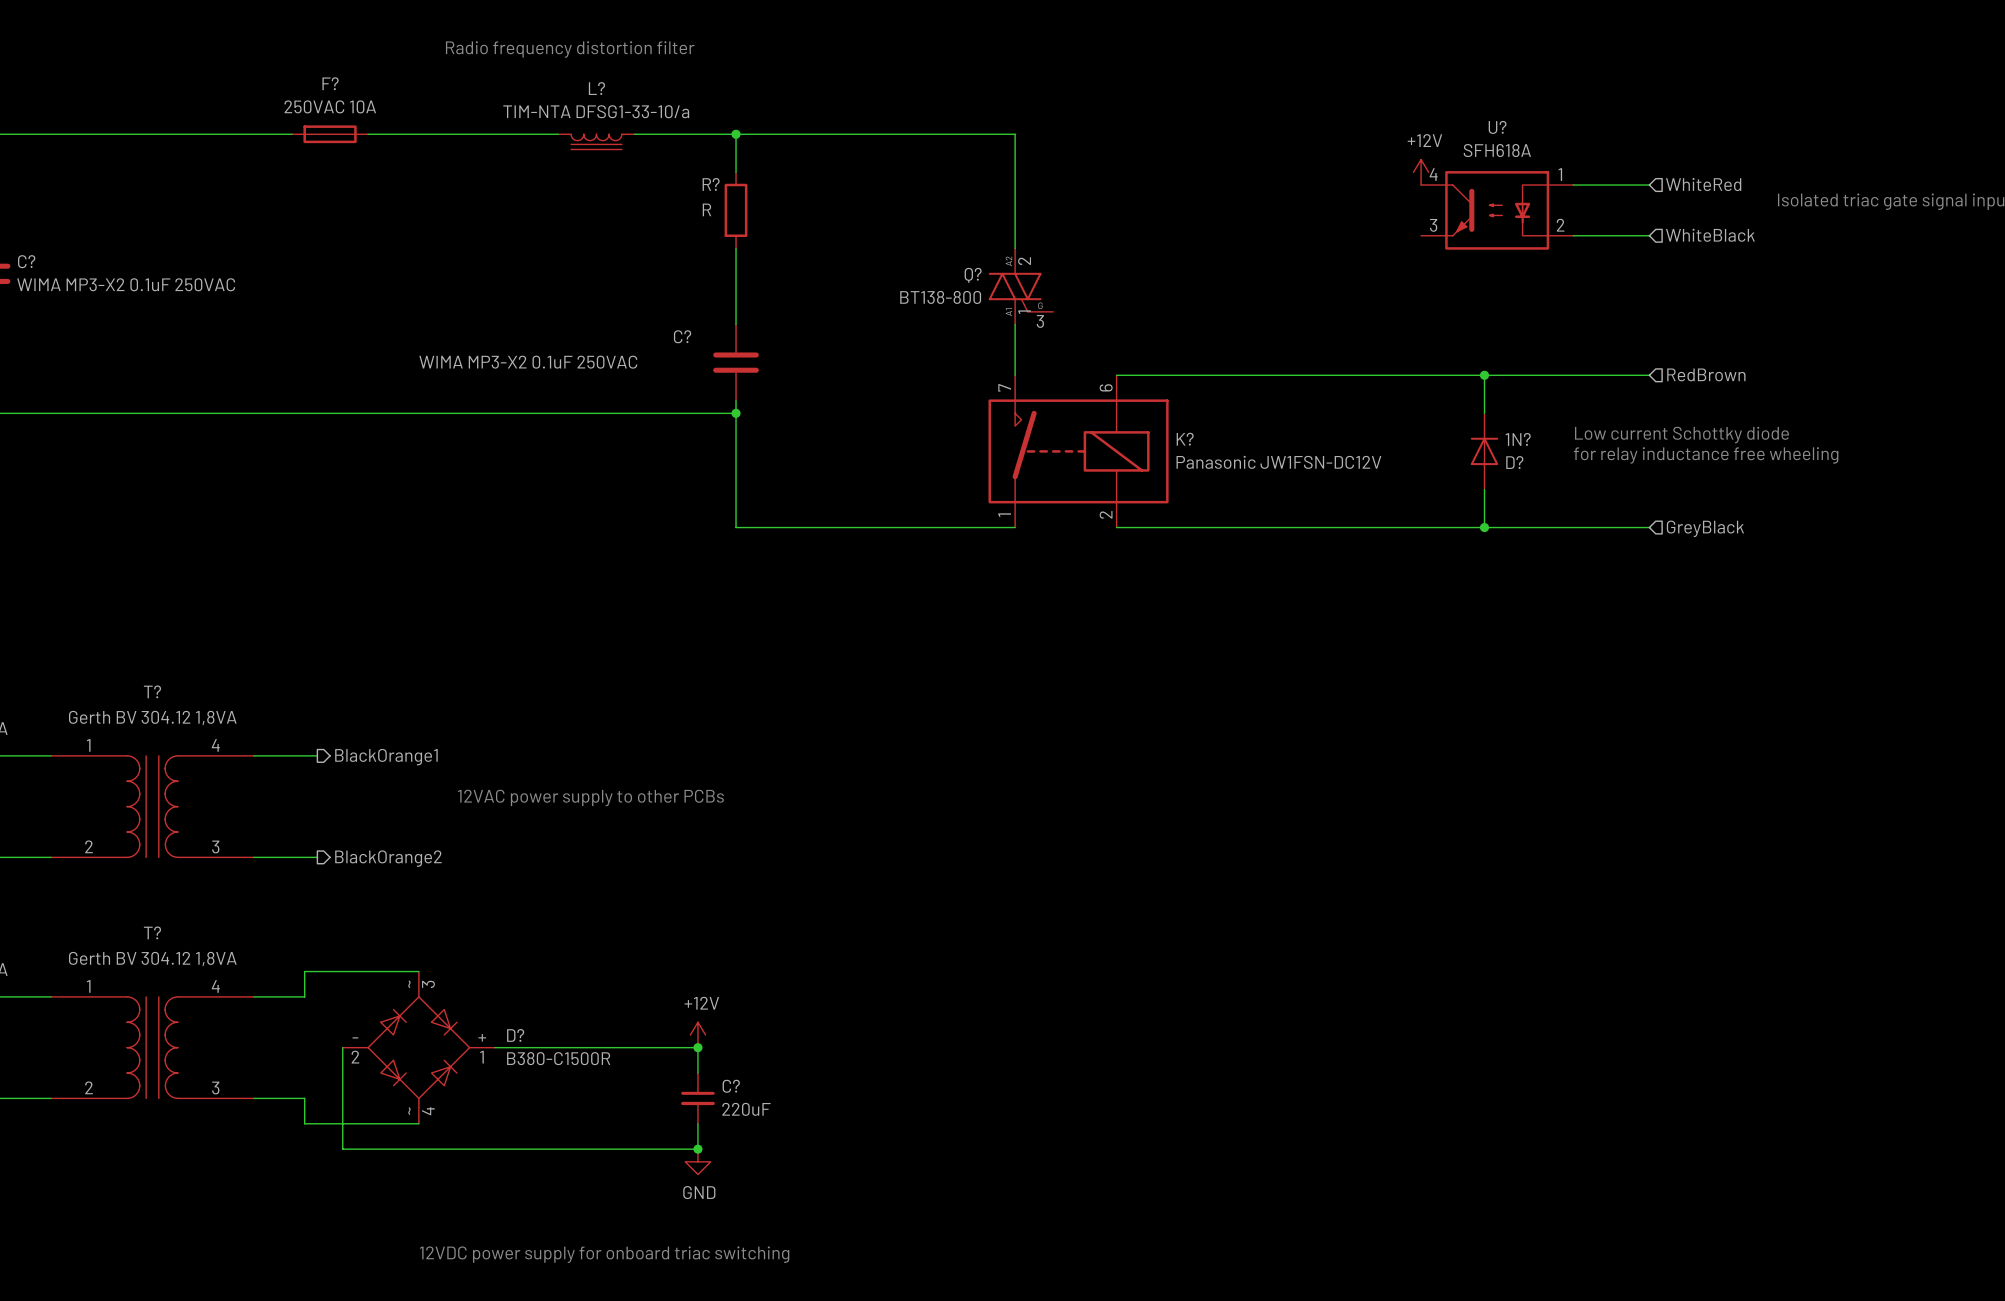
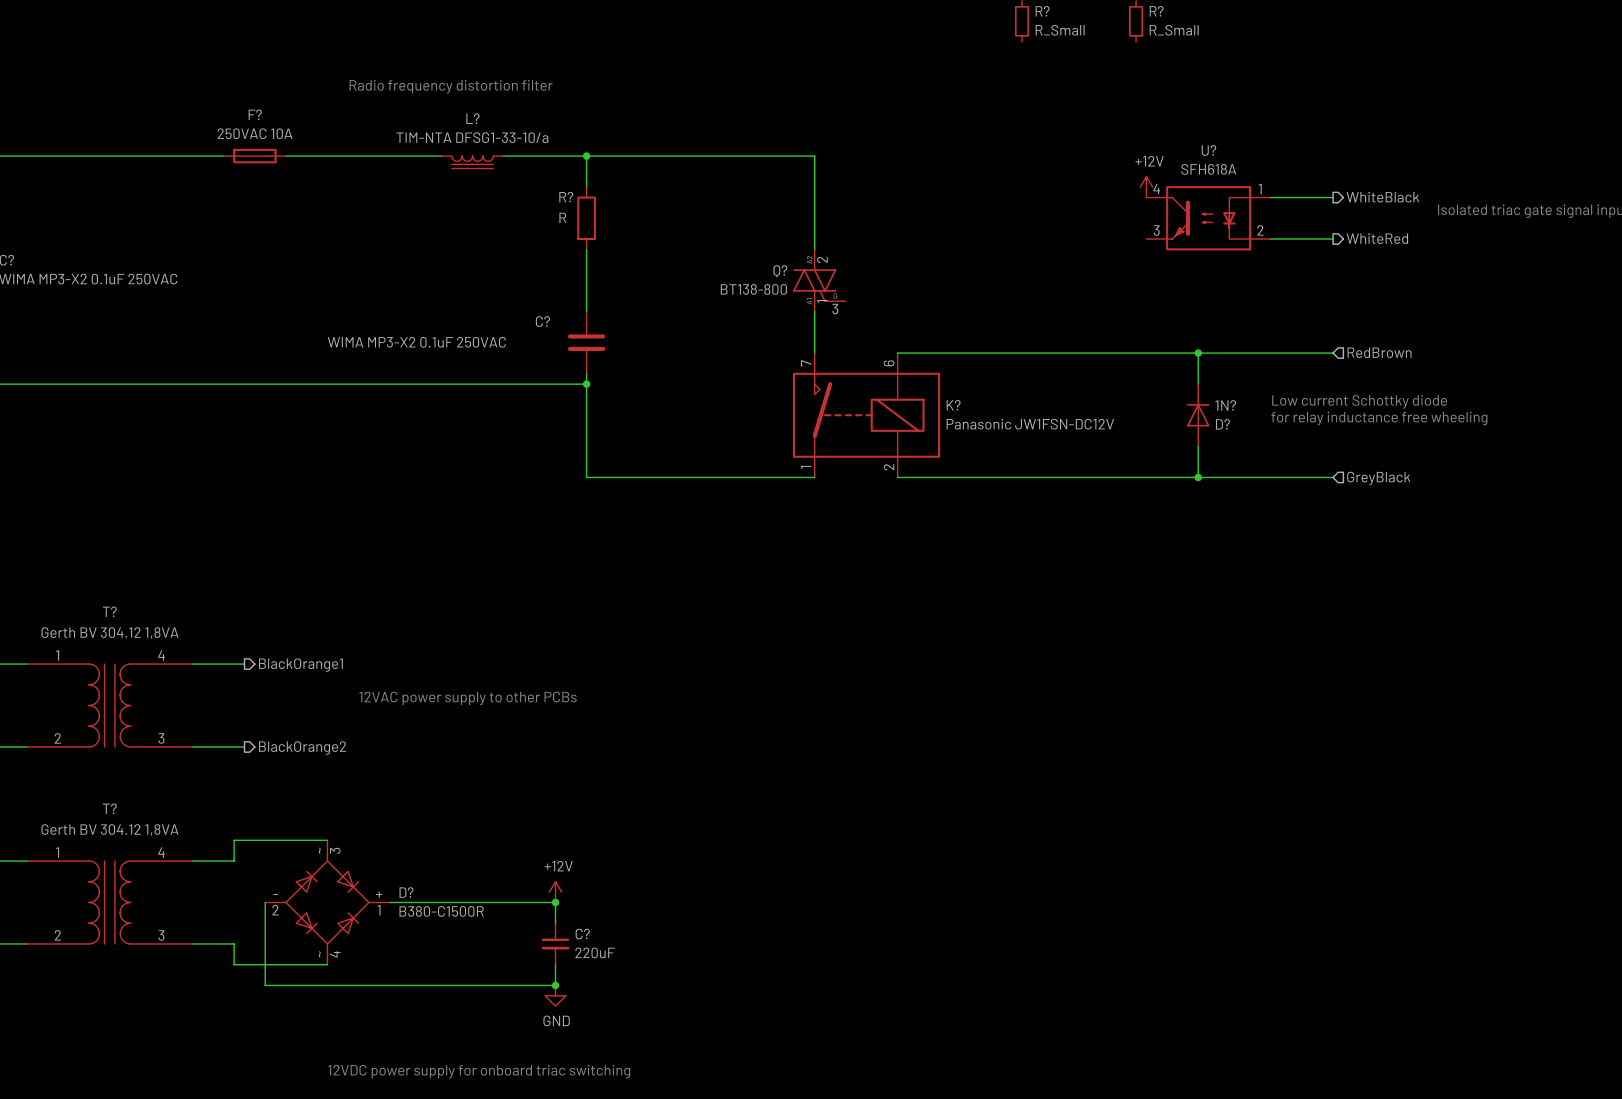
hierarchical label shape: input (1703, 184) -> output (1382, 197)
hierarchical label: WhiteRed (1703, 184) -> WhiteBlack (1382, 197)
hierarchical label shape: input (1710, 235) -> output (1377, 238)
hierarchical label: WhiteBlack (1710, 235) -> WhiteRed (1377, 238)

